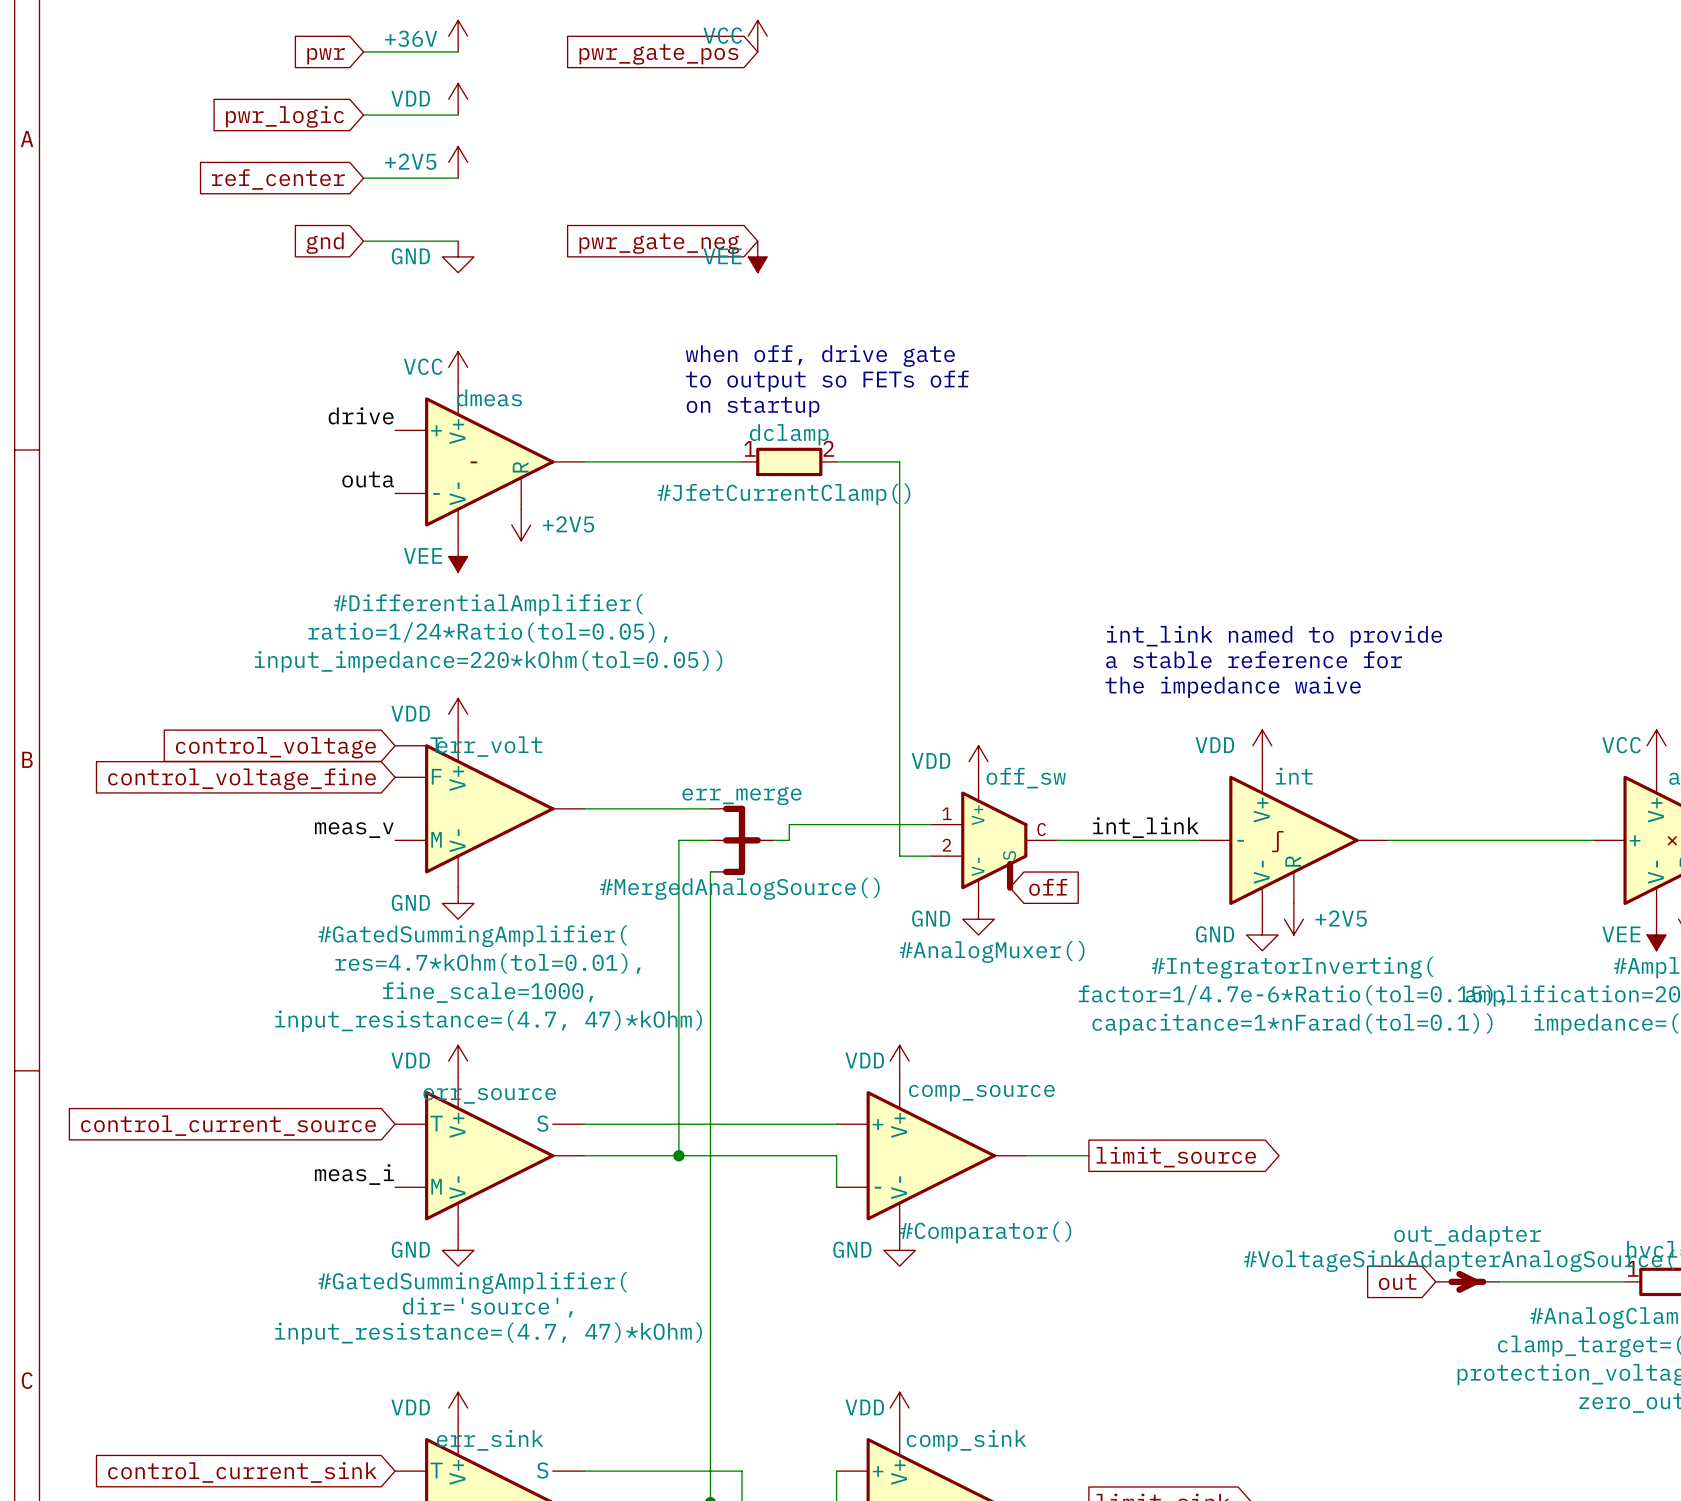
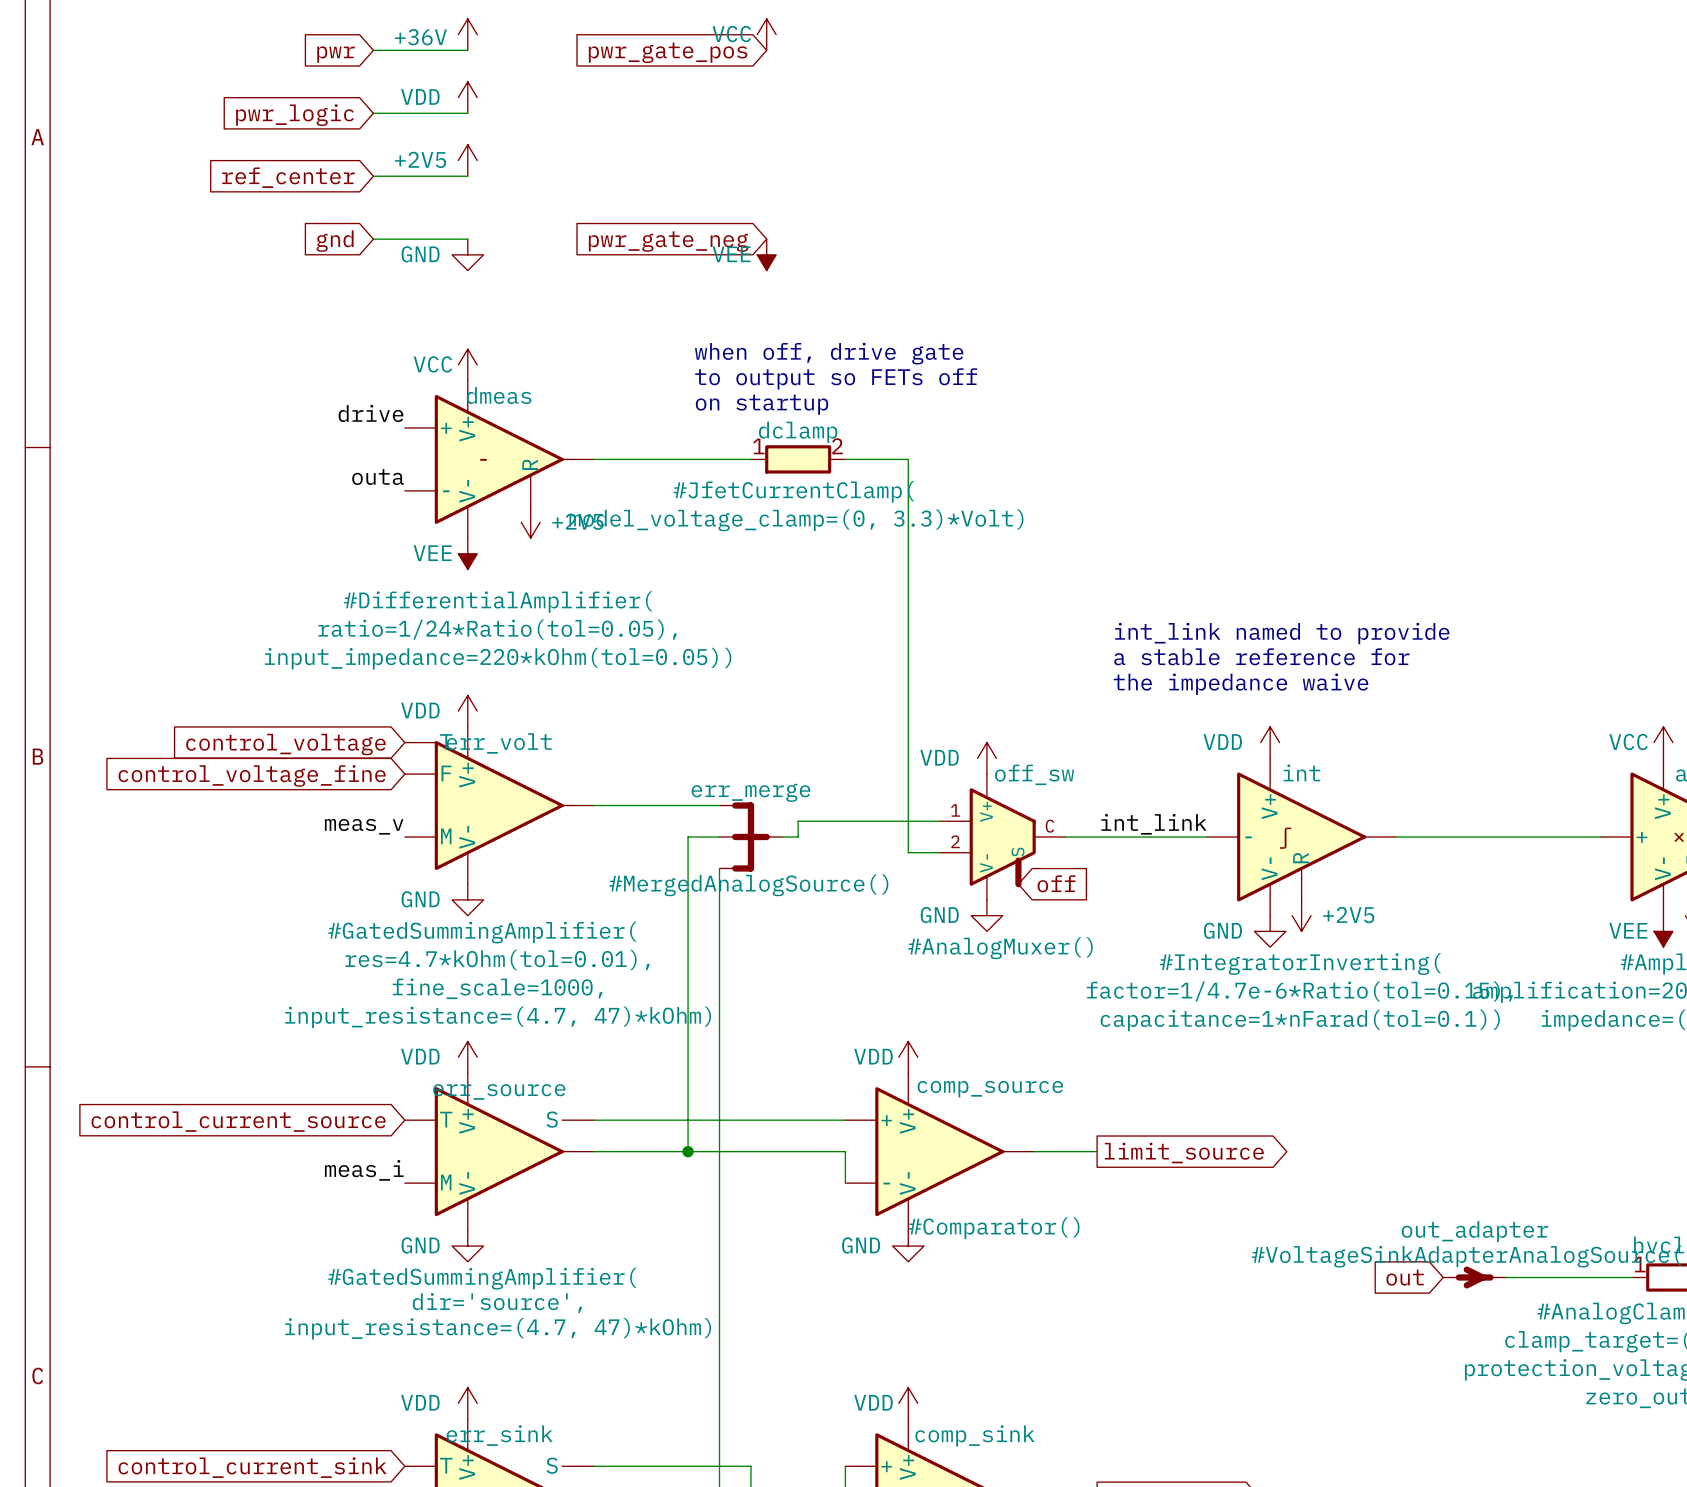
dclamp value: #JfetCurrentClamp() (784, 494) -> #JfetCurrentClamp( (794, 491)
dclamp text: none -> model_voltage_clamp=(0, 3.3)*Volt) (796, 520)

